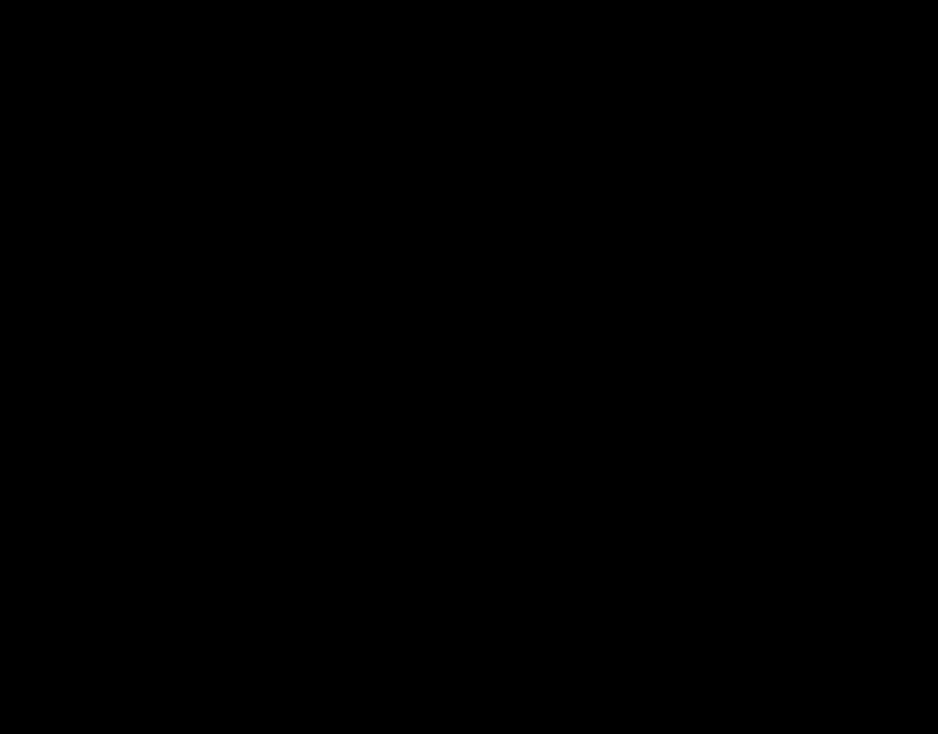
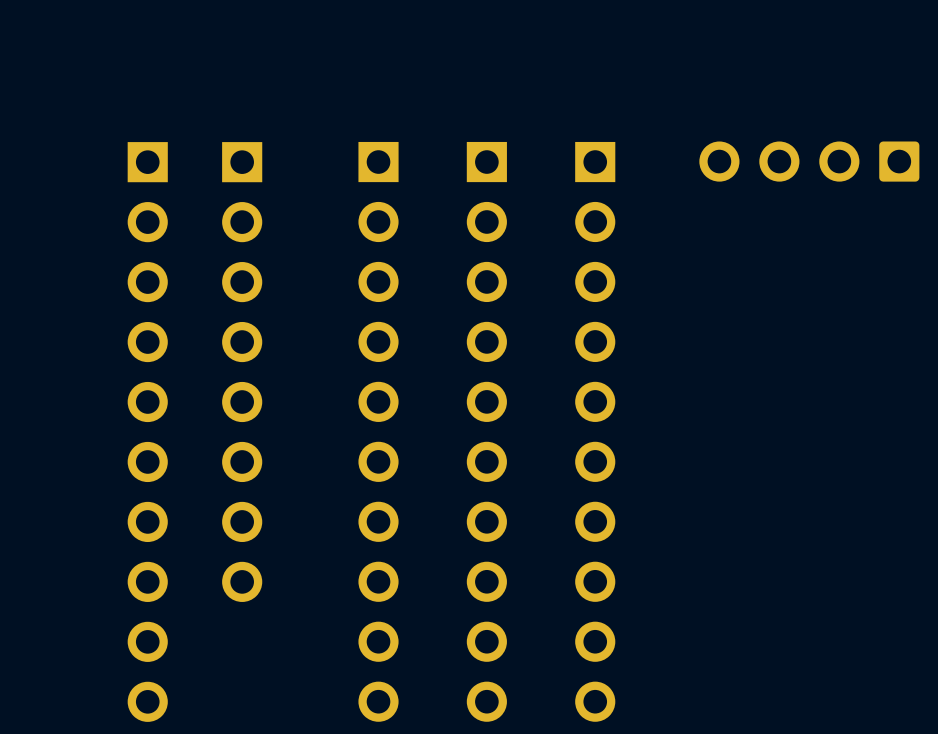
part: none -> (809, 161)
part: none -> (242, 372)
part: none -> (147, 431)
part: none -> (378, 431)
part: none -> (486, 431)
part: none -> (595, 431)

